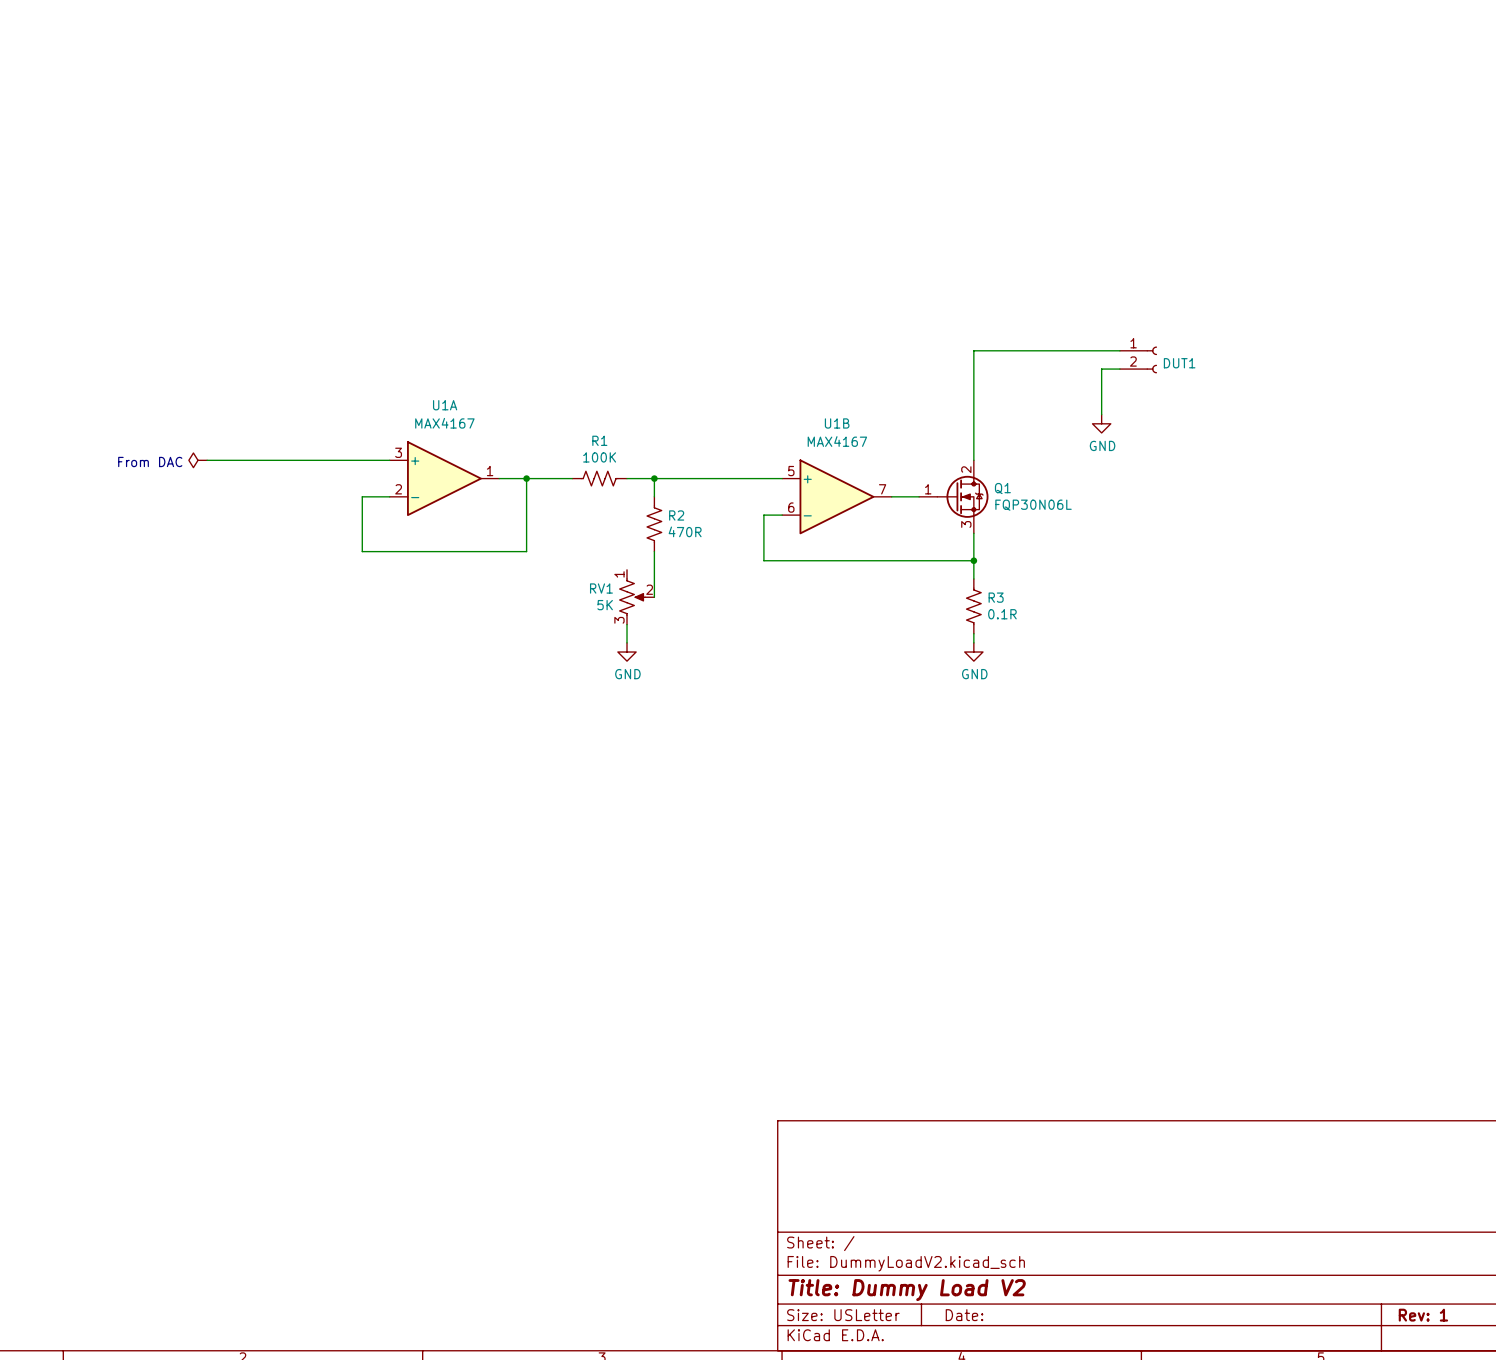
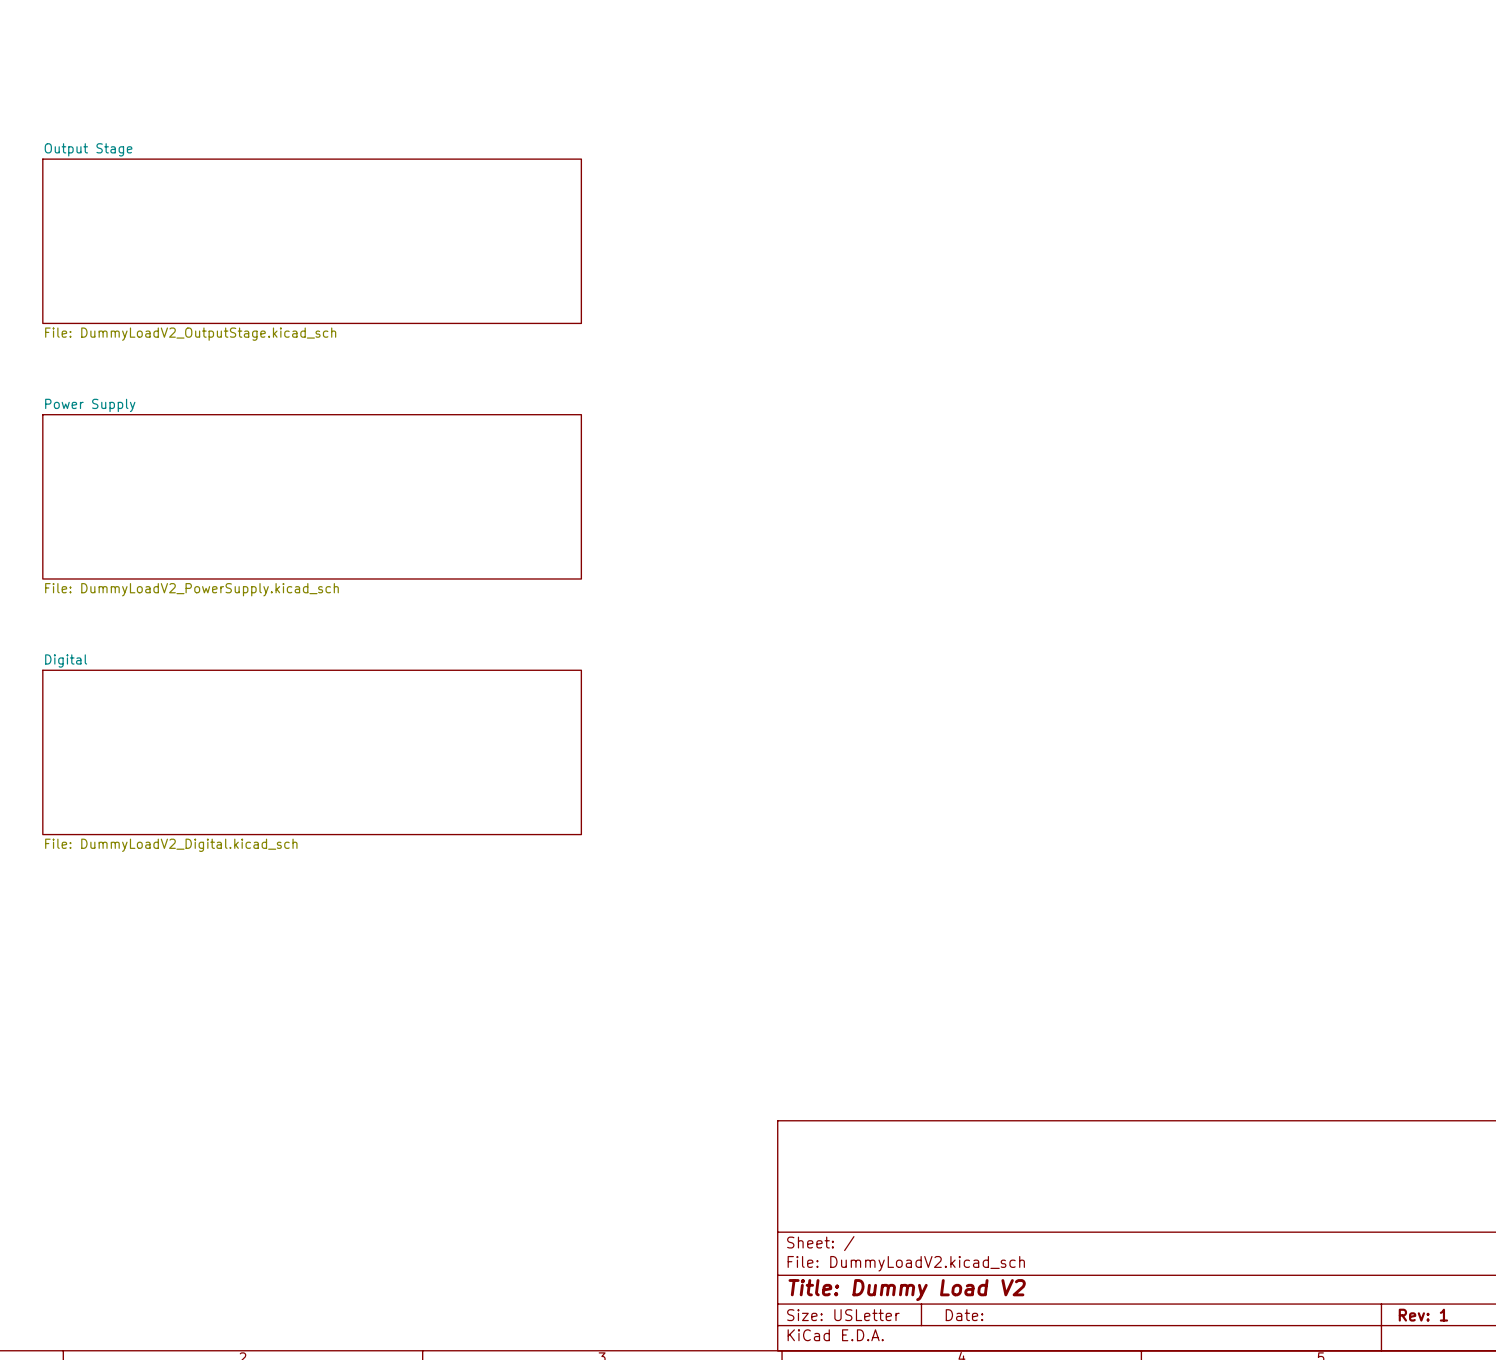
sheet Output Stage: none -> File: DummyLoadV2_OutputStage.kicad_sch (312, 241)
wire: (1119, 350) (973, 350) (973, 460) -> none
DUT1: (1138, 359) -> none
wire: (1119, 369) (1101, 369) (1101, 414) -> none
power symbol: GND (1101, 423) -> none
power symbol: (197, 460) -> none
wire: (207, 460) (389, 460) -> none
text: From DAC (150, 461) -> none
U1A: MAX4167 (444, 478) -> none
wire: (499, 478) (572, 478) -> none
wire: (526, 478) (526, 551) (362, 551) (362, 496) (389, 496) -> none
junction: (526, 478) -> none
R1: 100K (599, 478) -> none
wire: (627, 478) (782, 478) -> none
wire: (654, 478) (654, 496) -> none
junction: (654, 478) -> none
sheet Power Supply: none -> File: DummyLoadV2_PowerSupply.kicad_sch (312, 496)
U1B: MAX4167 (836, 496) -> none
wire: (891, 496) (919, 496) -> none
Q1: FQP30N06L (953, 496) -> none
wire: (782, 515) (763, 515) (763, 560) (973, 560) -> none
R2: 470R (654, 524) -> none
wire: (973, 533) (973, 578) -> none
wire: (654, 551) (654, 597) -> none
junction: (973, 560) -> none
RV1: 5K (637, 597) -> none
R3: 0.1R (973, 606) -> none
wire: (627, 624) (627, 642) -> none
wire: (973, 633) (973, 642) -> none
power symbol: GND (627, 652) -> none
power symbol: GND (973, 652) -> none
sheet Digital: none -> File: DummyLoadV2_Digital.kicad_sch (312, 752)

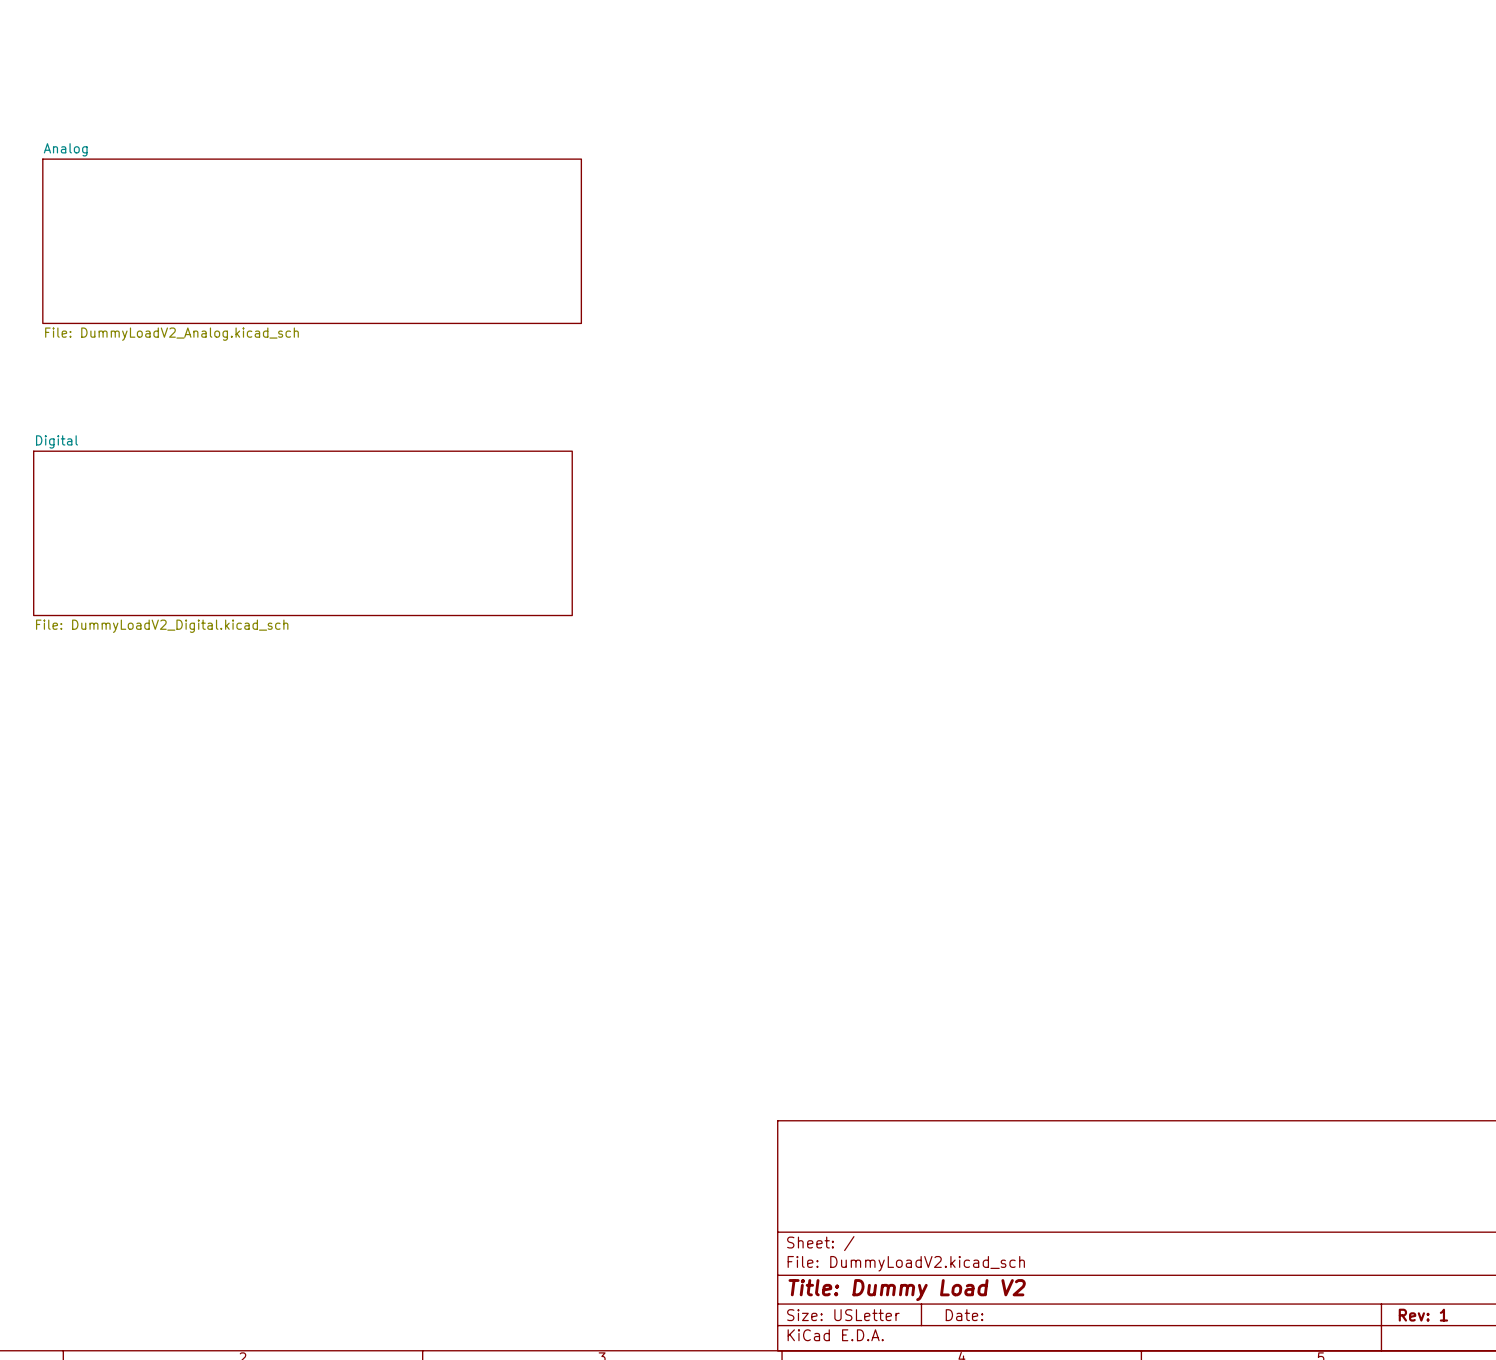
sheet Output Stage name: Output Stage (88, 149) -> Analog (65, 149)
sheet Output Stage value: File: DummyLoadV2_OutputStage.kicad_sch (190, 334) -> File: DummyLoadV2_Analog.kicad_sch (171, 334)
sheet Power Supply: File: DummyLoadV2_PowerSupply.kicad_sch (312, 496) -> none
sheet Digital: none -> File: DummyLoadV2_Digital.kicad_sch (302, 533)
sheet Digital: File: DummyLoadV2_Digital.kicad_sch (312, 752) -> none

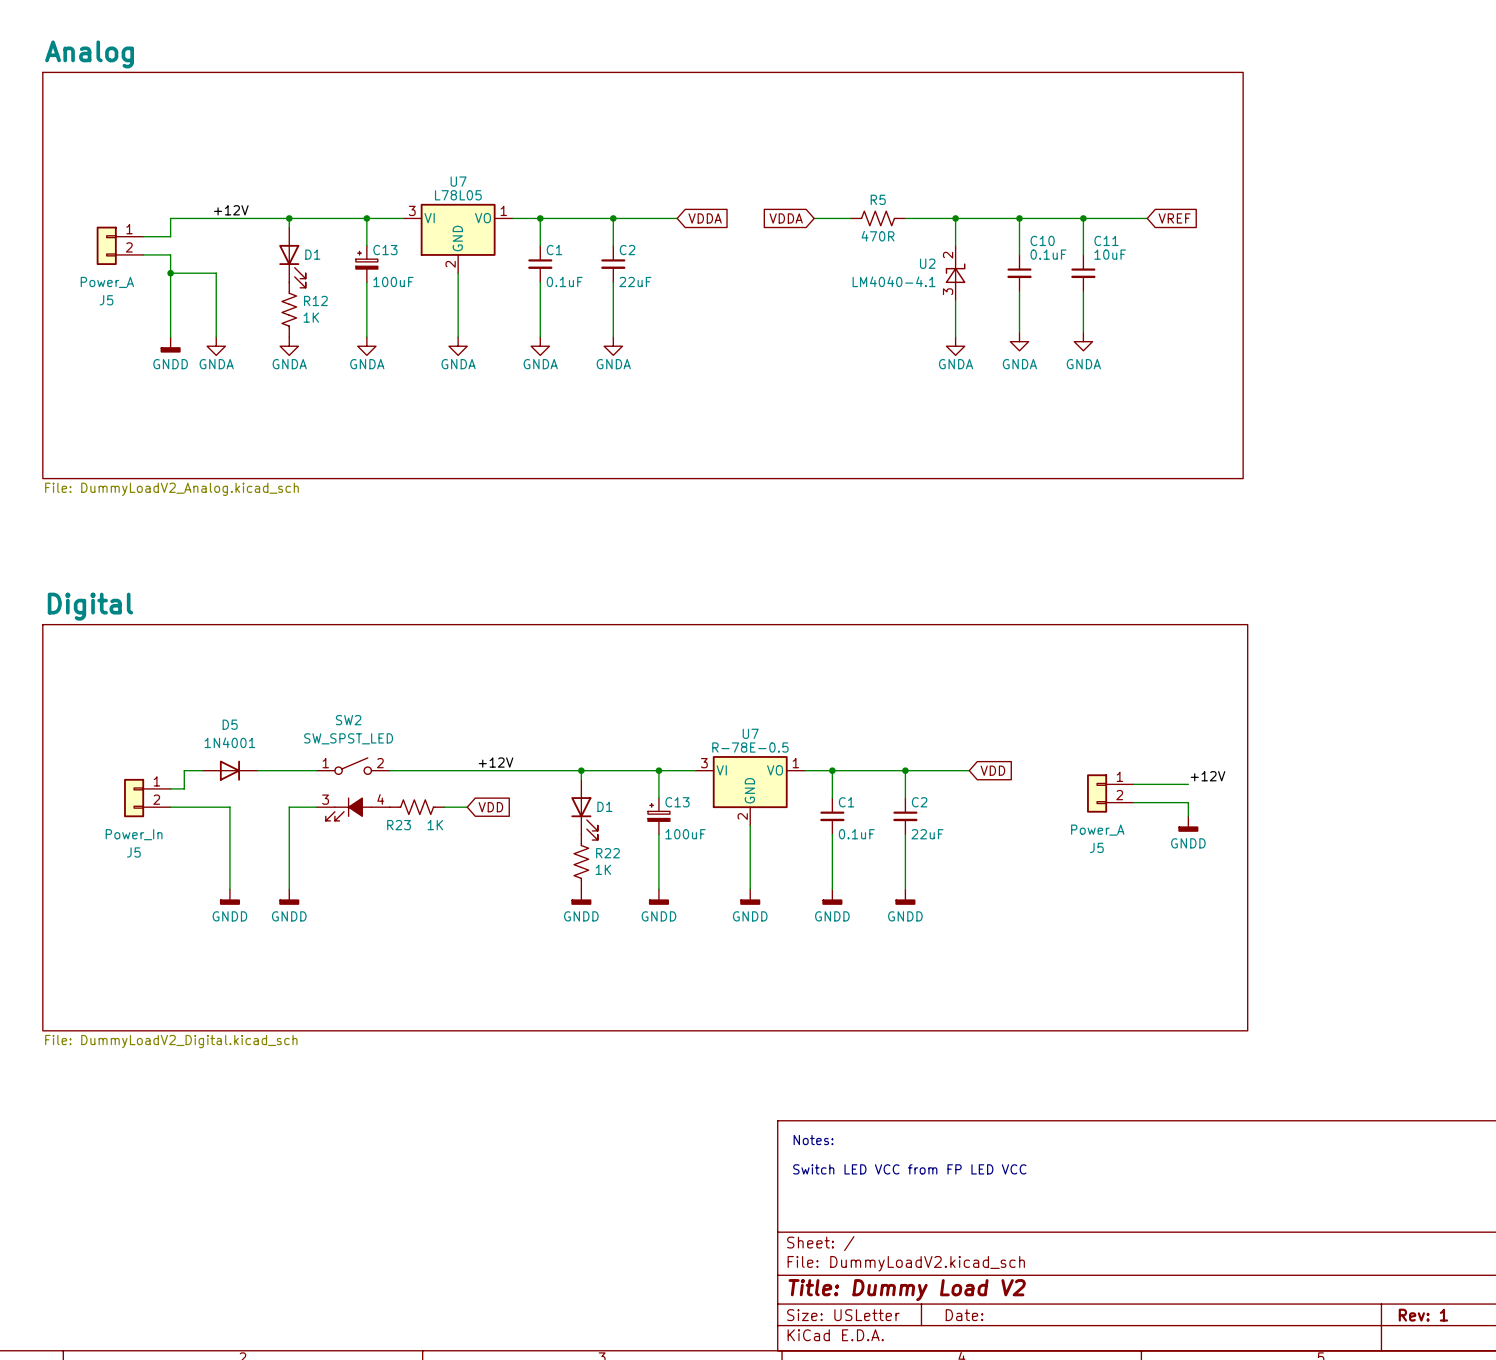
label: none -> +12V (231, 210)
wire: none -> (289, 218) (289, 227)
junction: none -> (289, 218)
wire: none -> (366, 218) (366, 245)
junction: none -> (366, 218)
wire: none -> (403, 218) (170, 218) (170, 236) (143, 236)
wire: none -> (512, 218) (677, 218)
wire: none -> (540, 218) (540, 245)
junction: none -> (540, 218)
wire: none -> (613, 218) (613, 245)
junction: none -> (613, 218)
global label: none -> VDDA (705, 218)
global label: none -> VDDA (786, 218)
wire: none -> (814, 218) (850, 218)
R5: none -> 470R (878, 218)
wire: none -> (905, 218) (1147, 218)
wire: none -> (955, 218) (955, 245)
junction: none -> (955, 218)
wire: none -> (1019, 218) (1019, 254)
junction: none -> (1019, 218)
wire: none -> (1083, 218) (1083, 254)
junction: none -> (1083, 218)
global label: none -> VREF (1174, 218)
U7: none -> L78L05 (458, 238)
sheet Analog: File: DummyLoadV2_Analog.kicad_sch (312, 241) -> none
J5: none -> Power_A (119, 245)
wire: none -> (143, 254) (170, 254) (170, 337)
D1: none -> (292, 257)
C13: none -> 100uF (366, 264)
C1: none -> 0.1uF (540, 264)
C2: none -> 22uF (613, 264)
wire: none -> (170, 273) (216, 273) (216, 337)
junction: none -> (170, 273)
wire: none -> (458, 273) (458, 337)
U2: none -> LM4040-4.1 (955, 273)
C10: none -> 0.1uF (1019, 273)
C11: none -> 10uF (1083, 273)
sheet Analog: none -> File: DummyLoadV2_Analog.kicad_sch (642, 275)
wire: none -> (366, 282) (366, 337)
wire: none -> (540, 282) (540, 337)
wire: none -> (613, 282) (613, 337)
wire: none -> (1019, 291) (1019, 332)
wire: none -> (1083, 291) (1083, 332)
wire: none -> (955, 300) (955, 337)
R12: none -> 1K (289, 309)
power symbol: none -> GNDA (1019, 341)
power symbol: none -> GNDA (1083, 341)
power symbol: none -> GNDD (170, 344)
power symbol: none -> GNDA (216, 346)
power symbol: none -> GNDA (289, 346)
power symbol: none -> GNDA (366, 346)
power symbol: none -> GNDA (458, 346)
power symbol: none -> GNDA (540, 346)
power symbol: none -> GNDA (613, 346)
power symbol: none -> GNDA (955, 346)
sheet Digital: File: DummyLoadV2_Digital.kicad_sch (302, 533) -> none
label: none -> +12V (496, 762)
wire: none -> (202, 770) (184, 770) (184, 788) (170, 788)
D5: none -> 1N4001 (229, 770)
wire: none -> (257, 770) (316, 770)
wire: none -> (389, 770) (695, 770)
wire: none -> (581, 770) (581, 779)
junction: none -> (581, 770)
wire: none -> (658, 770) (658, 798)
junction: none -> (658, 770)
wire: none -> (804, 770) (969, 770)
wire: none -> (832, 770) (832, 798)
junction: none -> (832, 770)
wire: none -> (905, 770) (905, 798)
junction: none -> (905, 770)
global label: none -> VDD (992, 770)
label: none -> +12V (1207, 776)
wire: none -> (1133, 784) (1188, 784)
SW2: none -> SW_SPST_LED (353, 789)
U7: none -> R-78E-0.5 (750, 790)
J5: none -> Power_A (1110, 793)
J5: none -> Power_In (147, 798)
wire: none -> (1133, 802) (1188, 802) (1188, 816)
wire: none -> (170, 807) (229, 807) (229, 889)
wire: none -> (316, 807) (289, 807) (289, 889)
R23: none -> 1K (417, 807)
wire: none -> (444, 807) (467, 807)
global label: none -> VDD (490, 807)
D1: none -> (584, 809)
C13: none -> 100uF (658, 816)
C1: none -> 0.1uF (832, 816)
C2: none -> 22uF (905, 816)
power symbol: none -> GNDD (1188, 824)
wire: none -> (750, 825) (750, 889)
sheet Digital: none -> File: DummyLoadV2_Digital.kicad_sch (645, 827)
wire: none -> (658, 834) (658, 889)
wire: none -> (832, 834) (832, 889)
wire: none -> (905, 834) (905, 889)
R22: none -> 1K (581, 861)
power symbol: none -> GNDD (229, 897)
power symbol: none -> GNDD (289, 897)
power symbol: none -> GNDD (581, 897)
power symbol: none -> GNDD (658, 897)
power symbol: none -> GNDD (750, 897)
power symbol: none -> GNDD (832, 897)
power symbol: none -> GNDD (905, 897)
text: none -> Notes: (813, 1139)
text: none -> Switch LED VCC from FP LED VCC (909, 1169)

